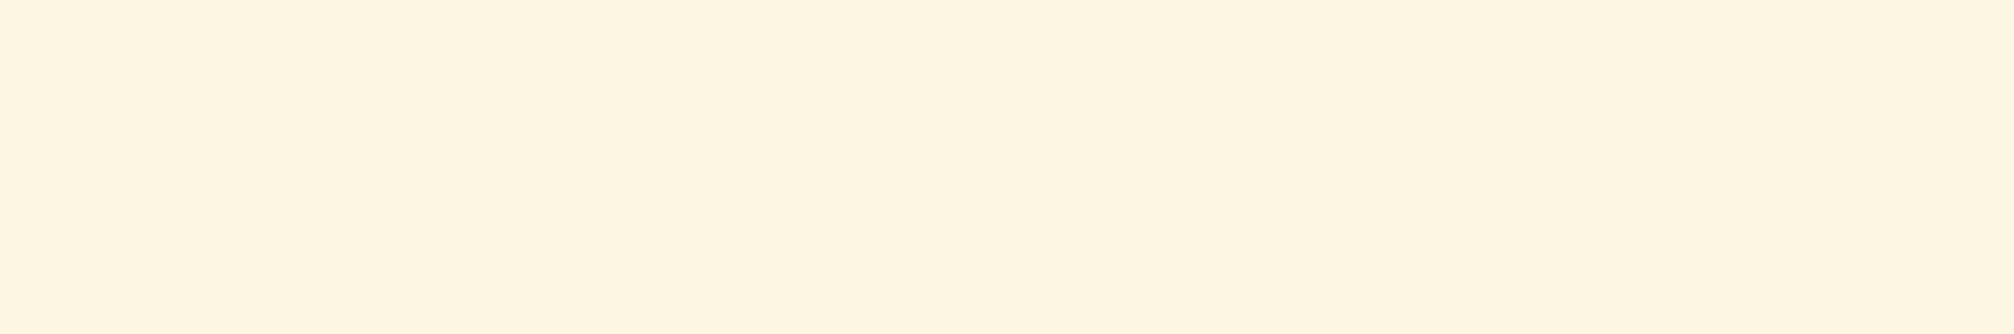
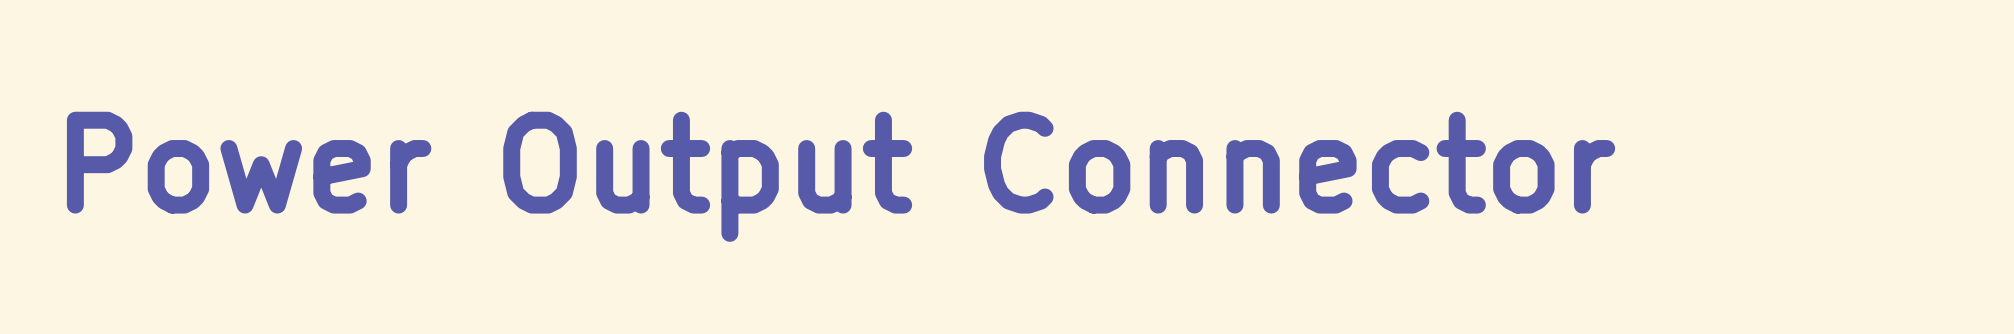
text: none -> Power Output Connector (841, 176)

